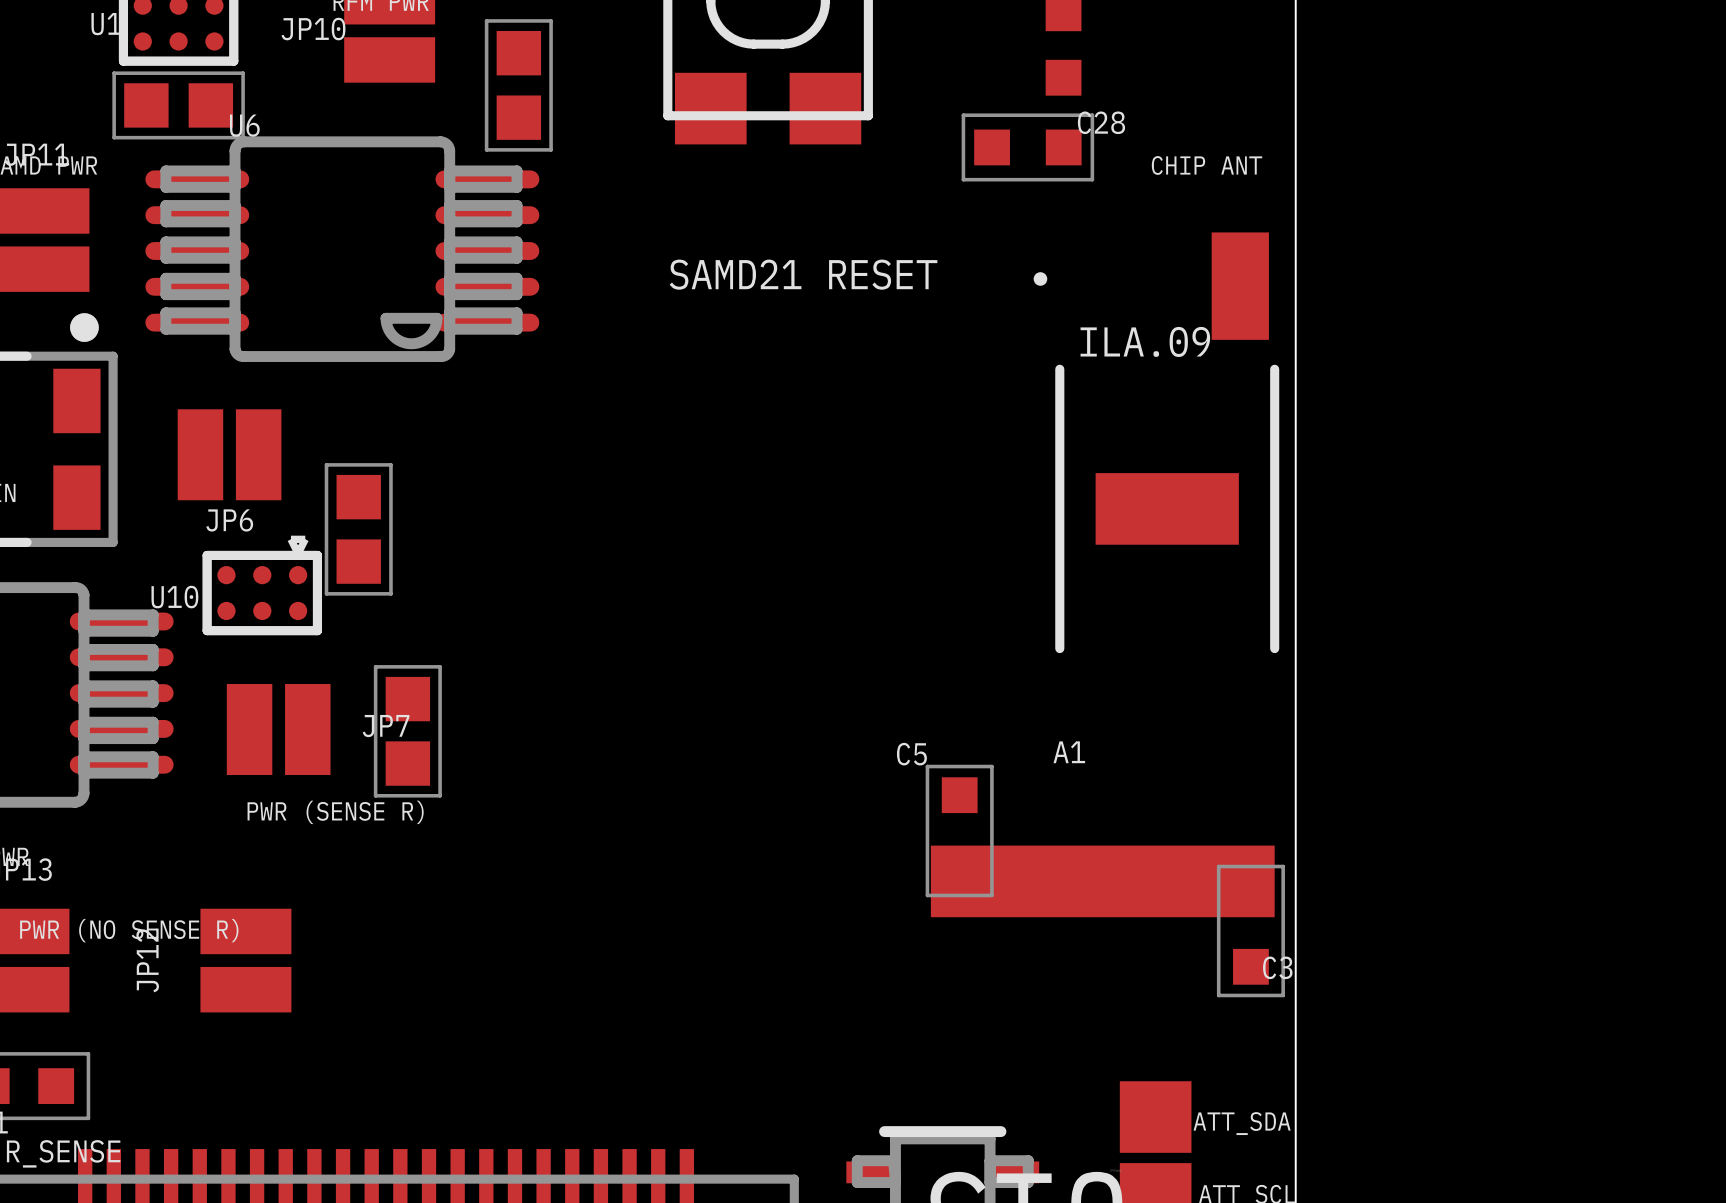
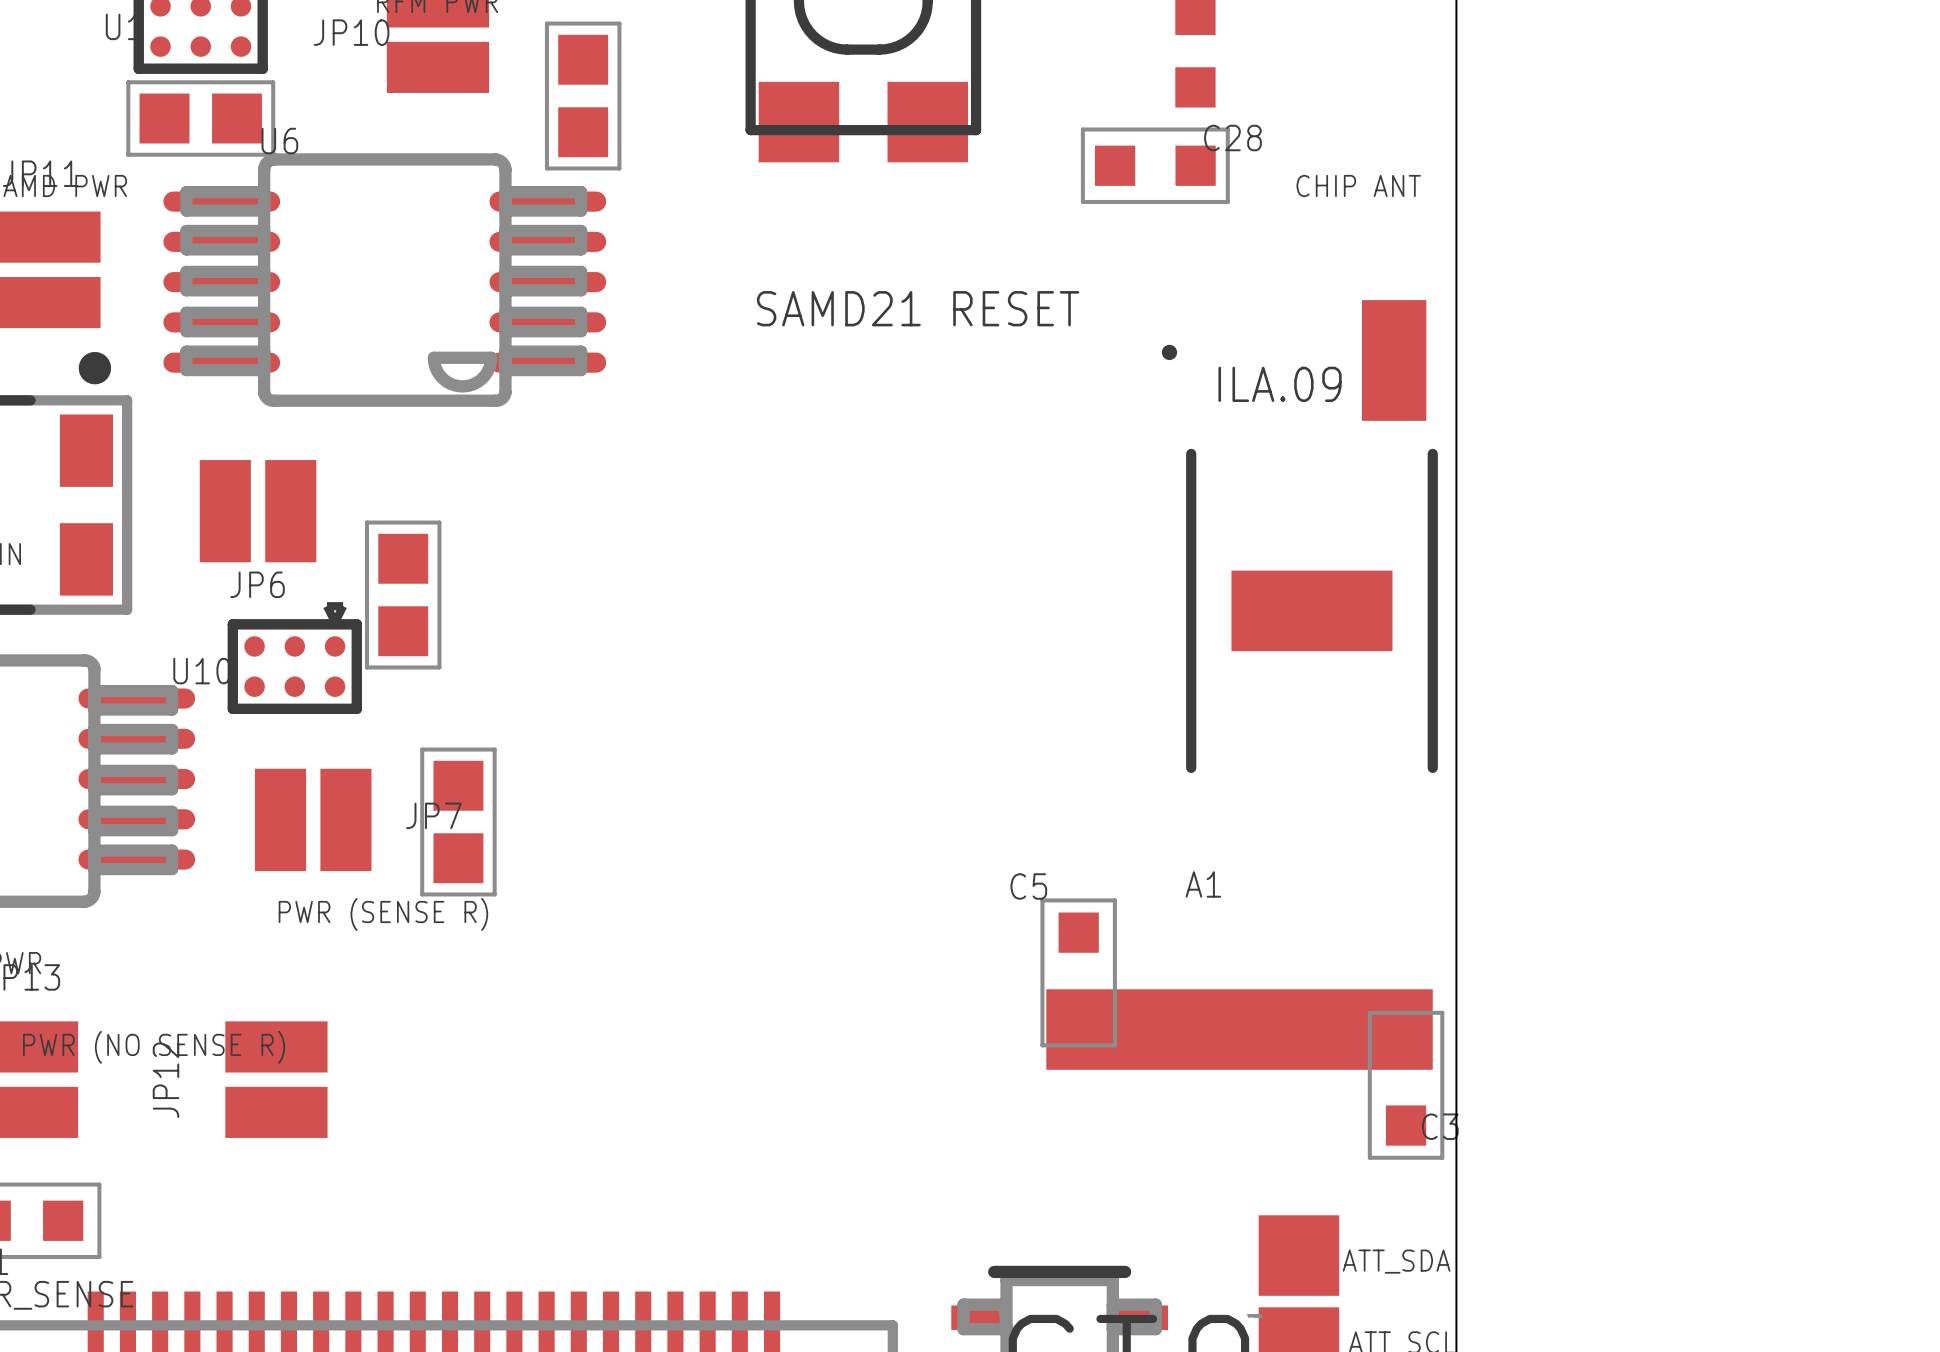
A1 position: (1105, 574) -> (1242, 684)
C5 position: (959, 831) -> (1078, 972)
C3 position: (1250, 931) -> (1406, 1085)

